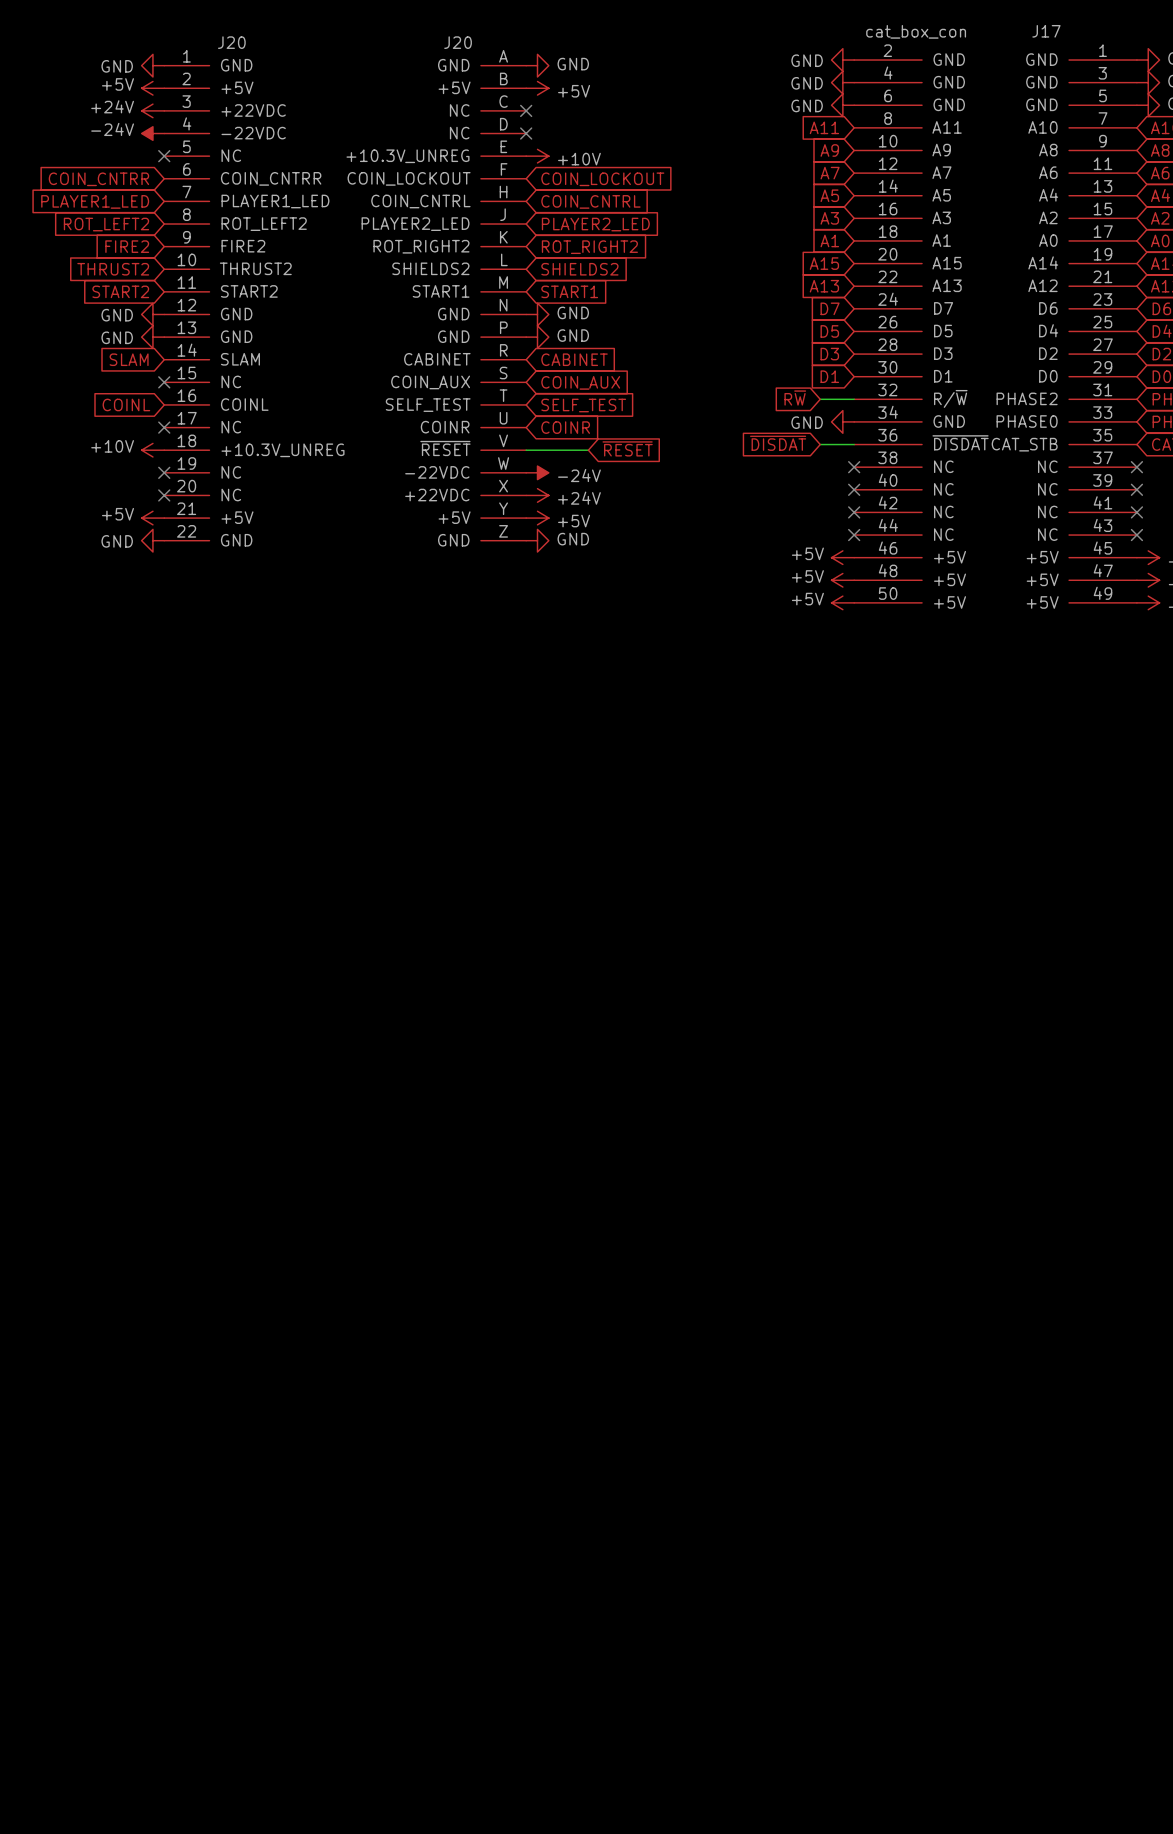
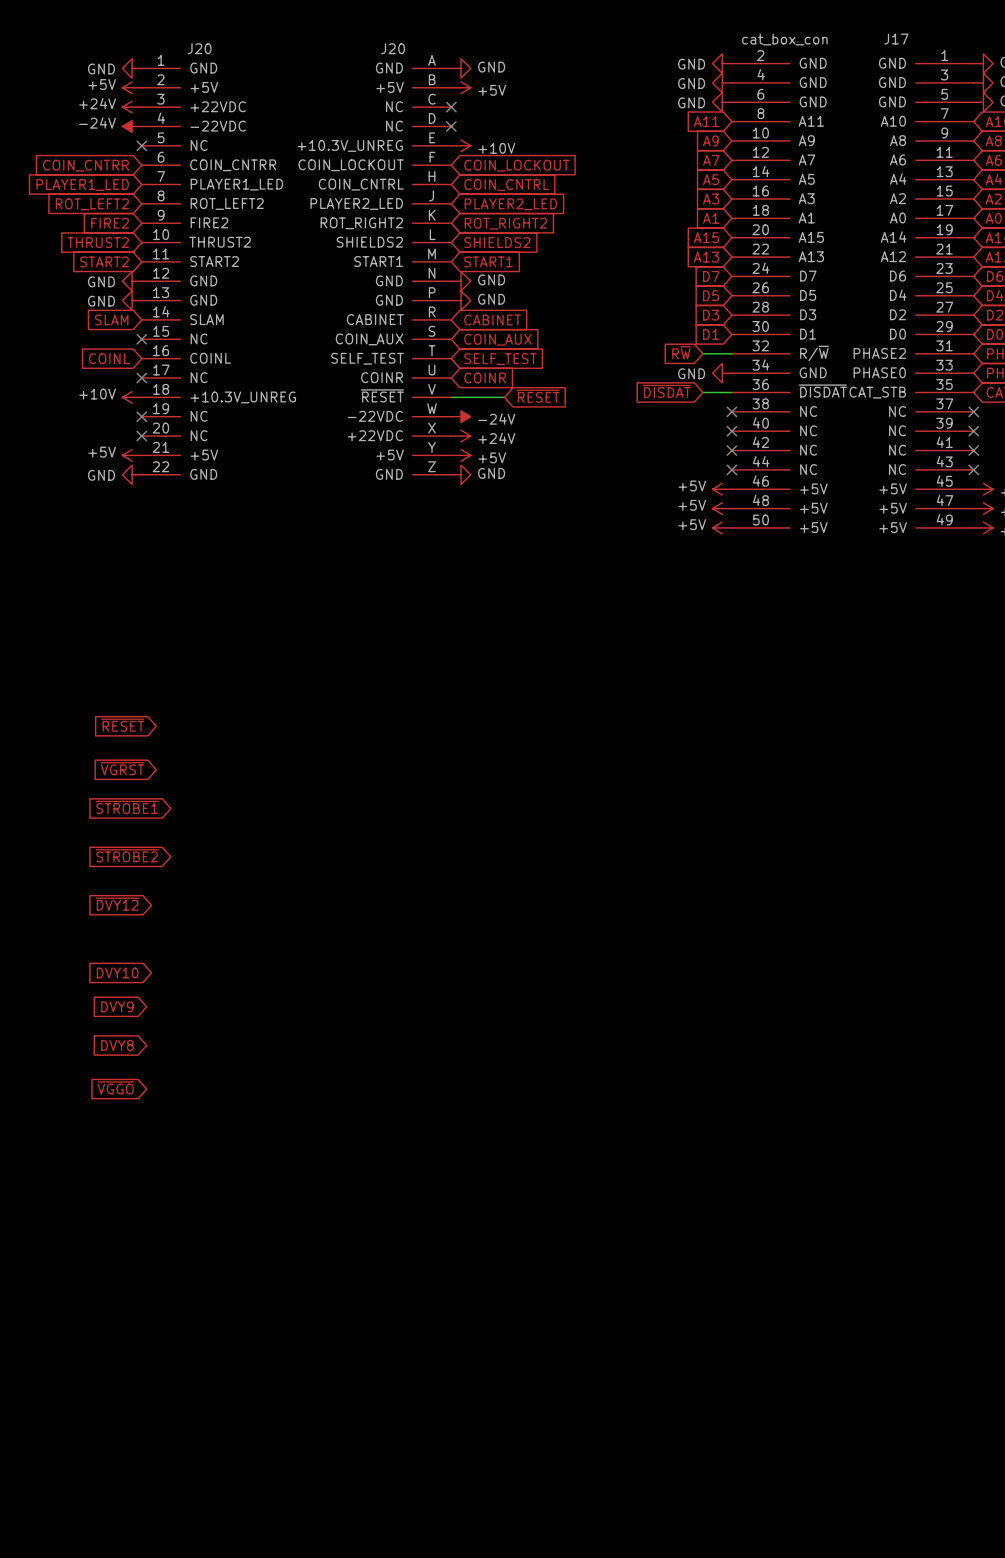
global label: none -> ~{RESET} (122, 725)
global label: none -> ~{VGRST} (122, 768)
global label: none -> ~{STROBE1} (127, 807)
global label: none -> ~{STROBE2} (127, 855)
global label: none -> ~{DVY12} (117, 904)
global label: none -> DVY10 (117, 972)
global label: none -> DVY9 (117, 1006)
global label: none -> DVY8 (117, 1045)
global label: none -> ~{VGGO} (116, 1087)

